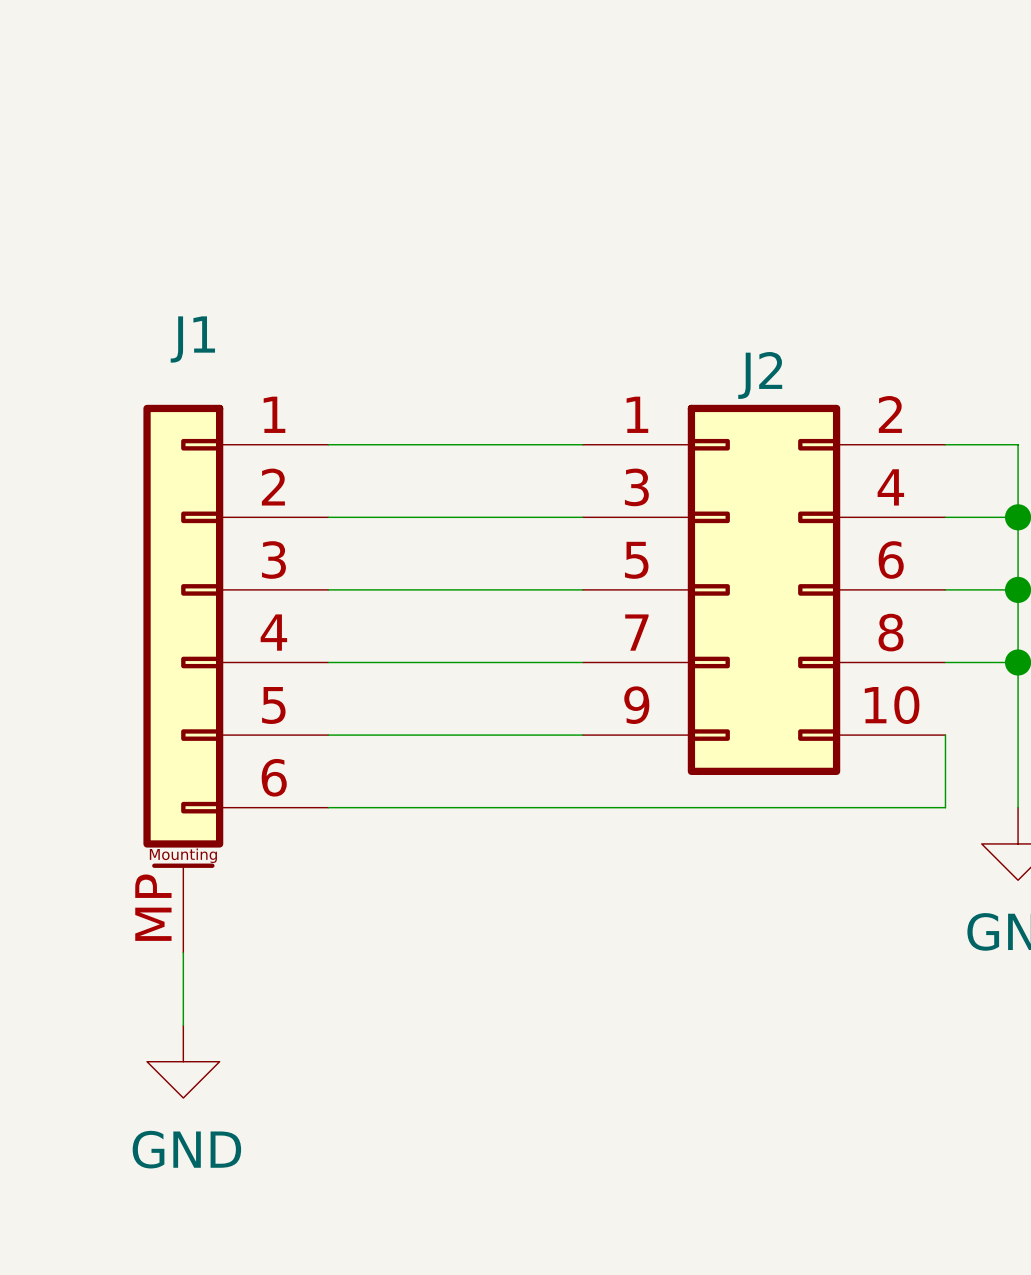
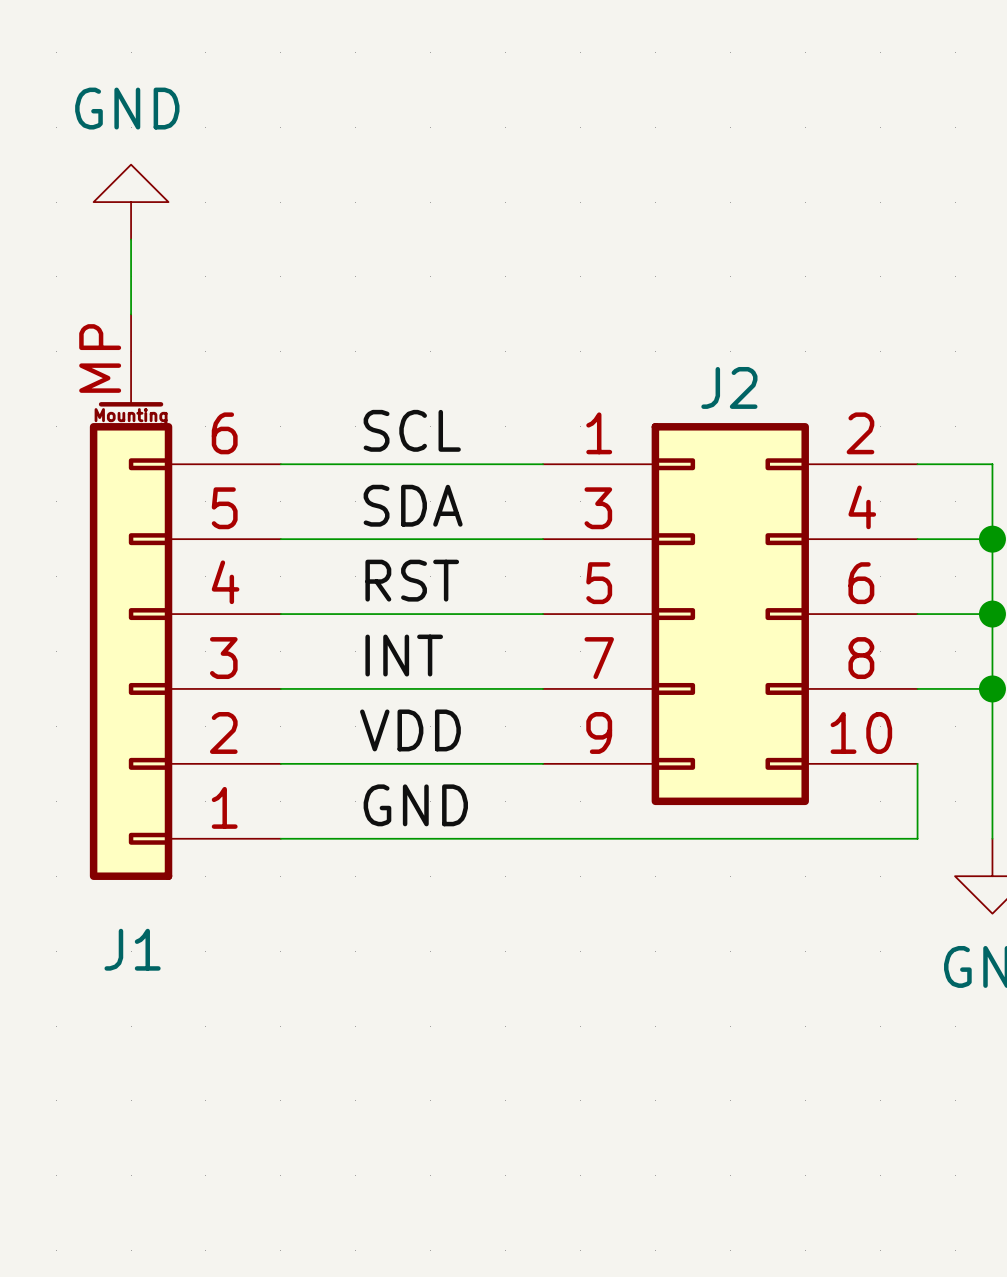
power symbol: none -> GND (131, 202)
wire: none -> (131, 239) (131, 314)
label: none -> SCL (412, 430)
label: none -> SDA (413, 505)
label: none -> RST (412, 580)
label: none -> INT (404, 655)
J1 flip: as is (183, 636) -> up-down (131, 641)
label: none -> VDD (410, 730)
label: none -> GND (415, 805)
wire: (183, 952) (183, 1025) -> none
power symbol: GND (183, 1061) -> none

